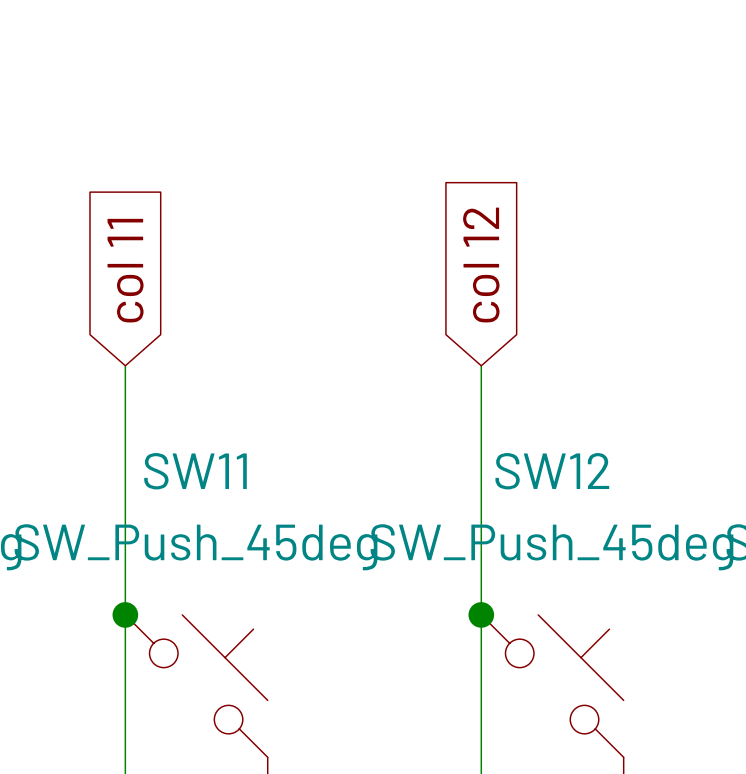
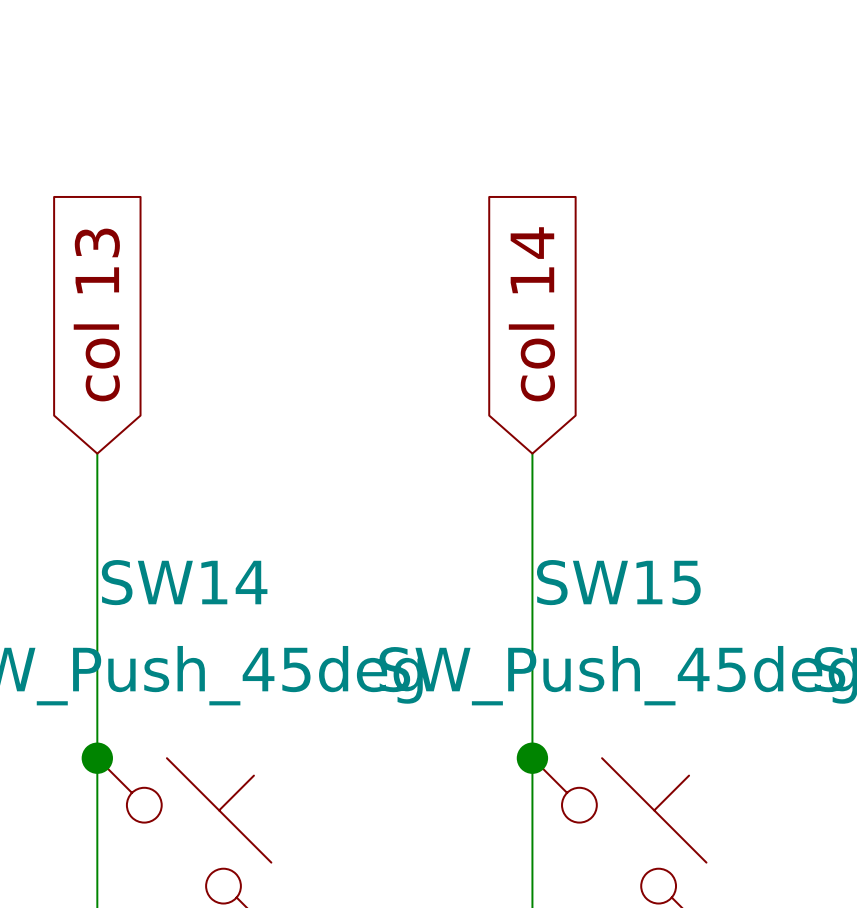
global label: col 12 (481, 265) -> col 14 (531, 314)
global label: col 11 (125, 270) -> col 13 (96, 315)
SW11 name: SW11 (195, 471) -> SW14 (184, 582)
SW12 name: SW12 (552, 471) -> SW15 (618, 582)

